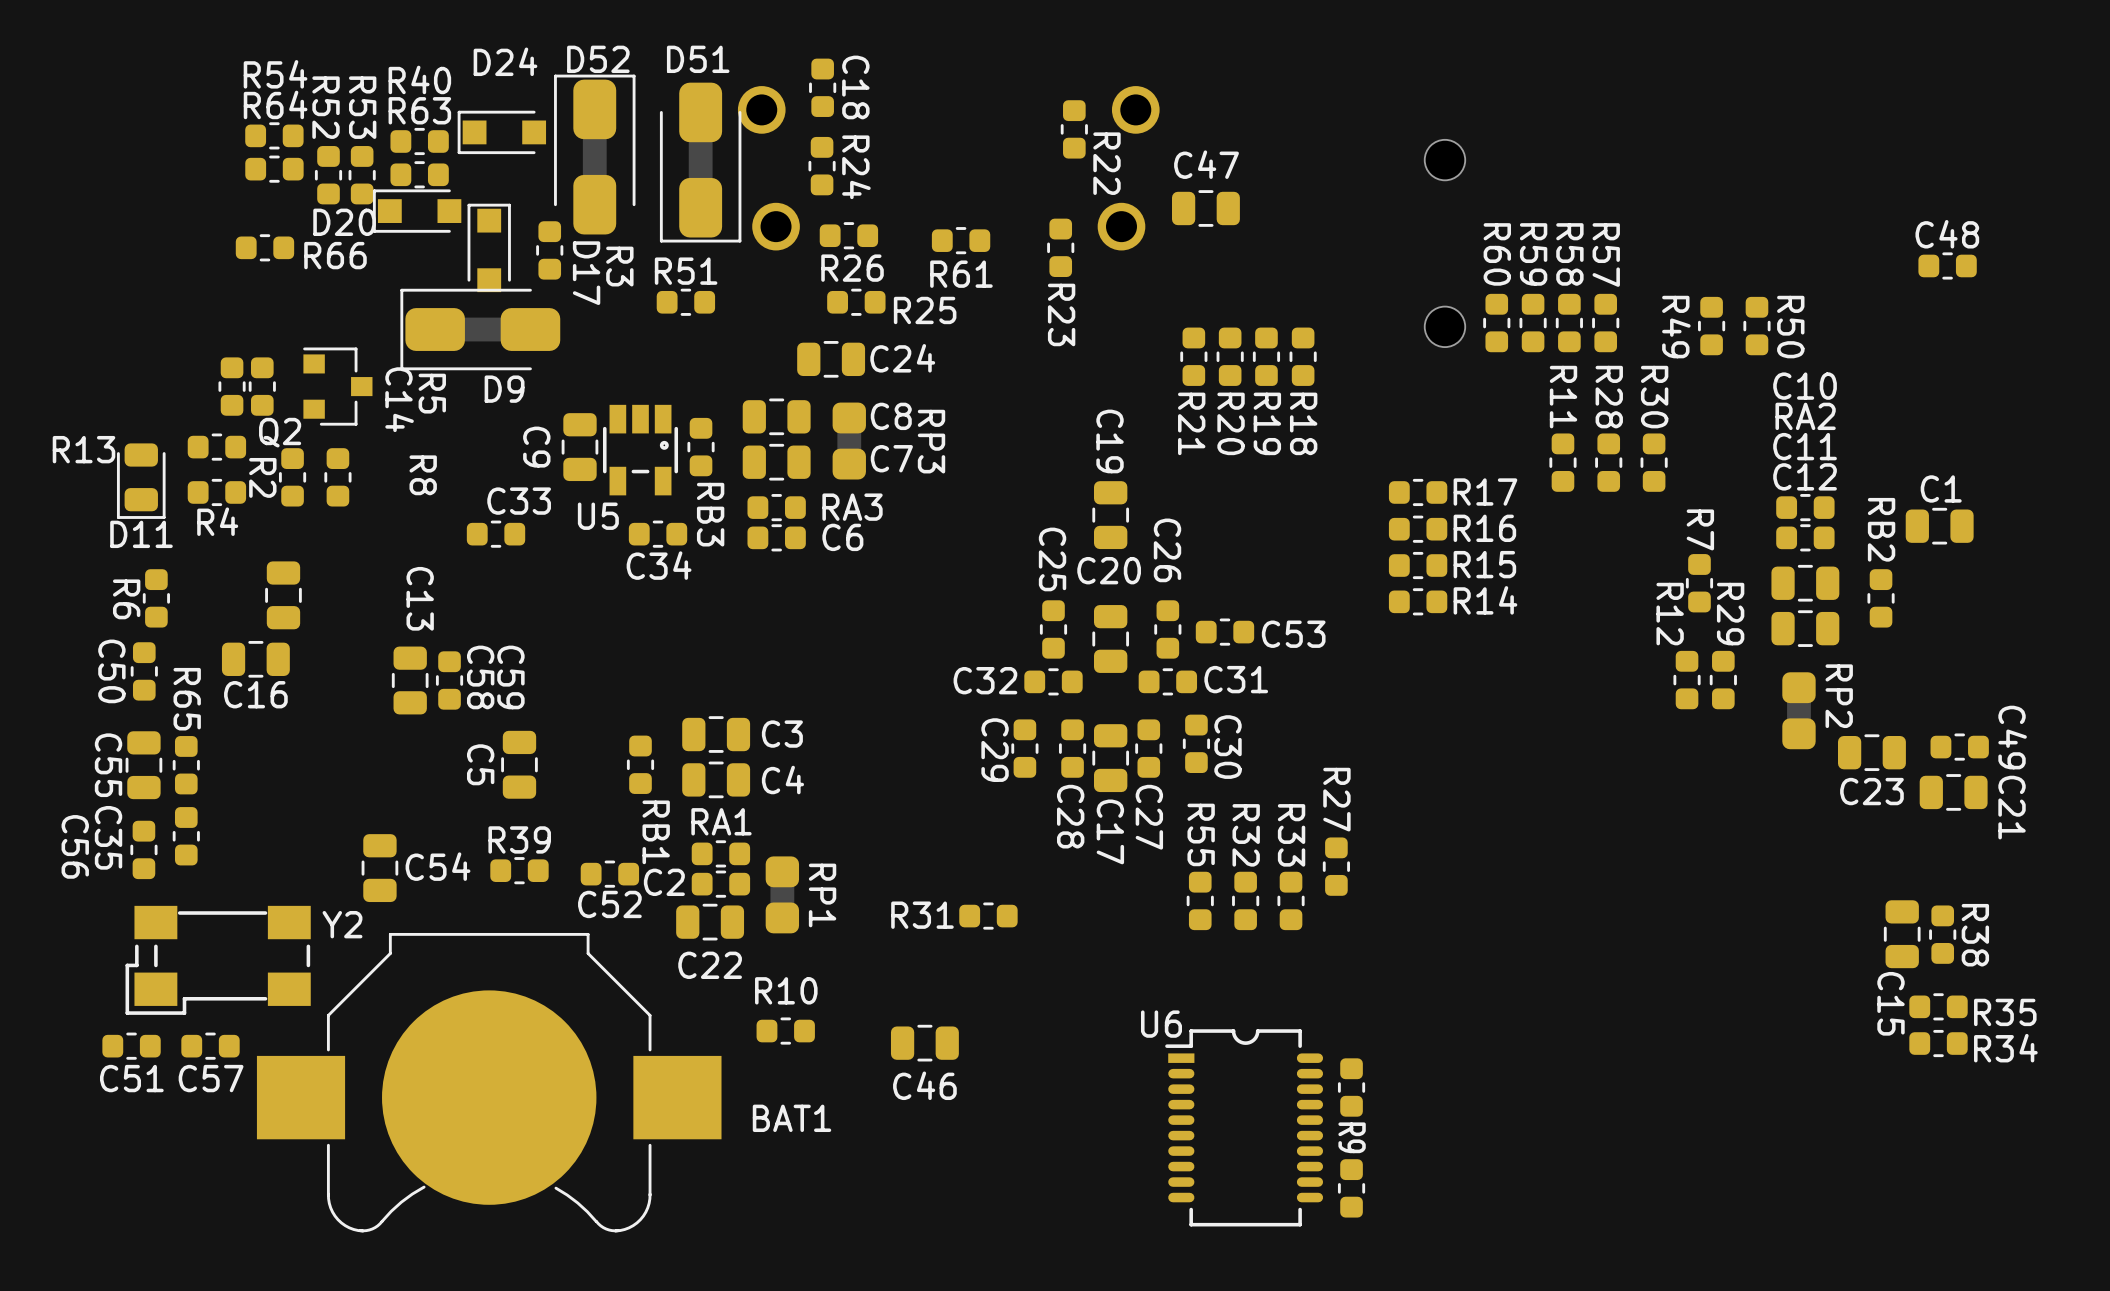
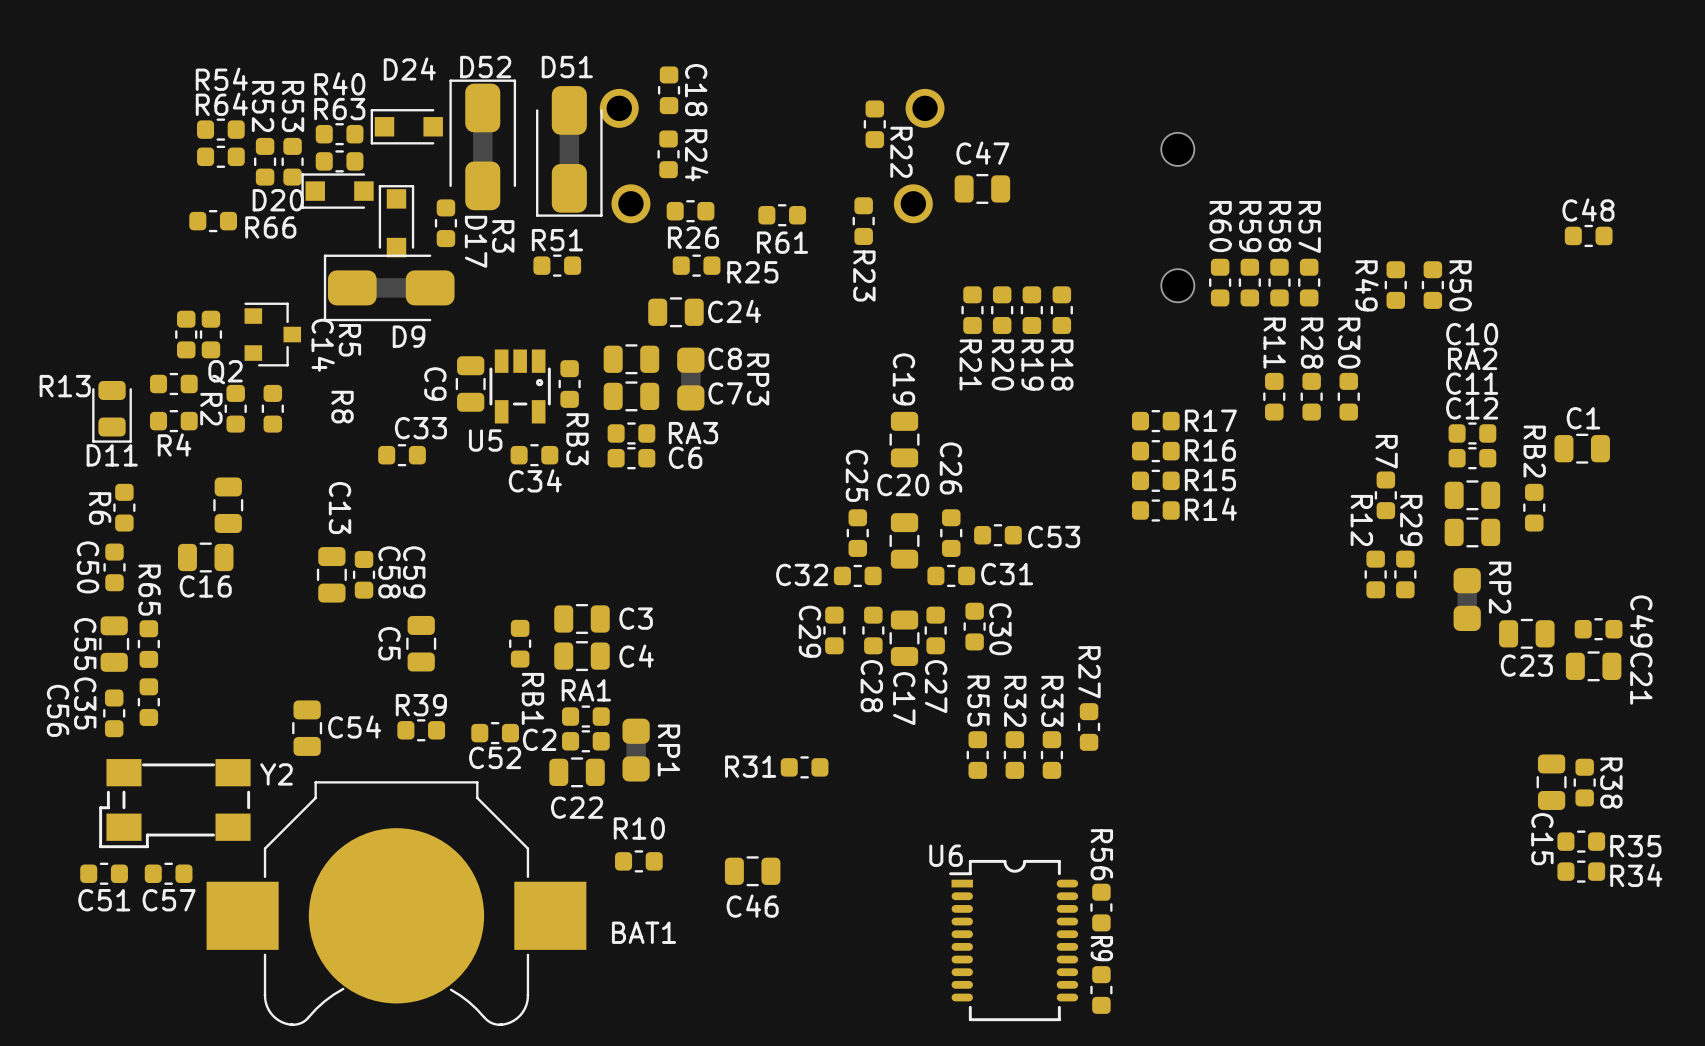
R56 name: none -> R56 (1101, 854)

